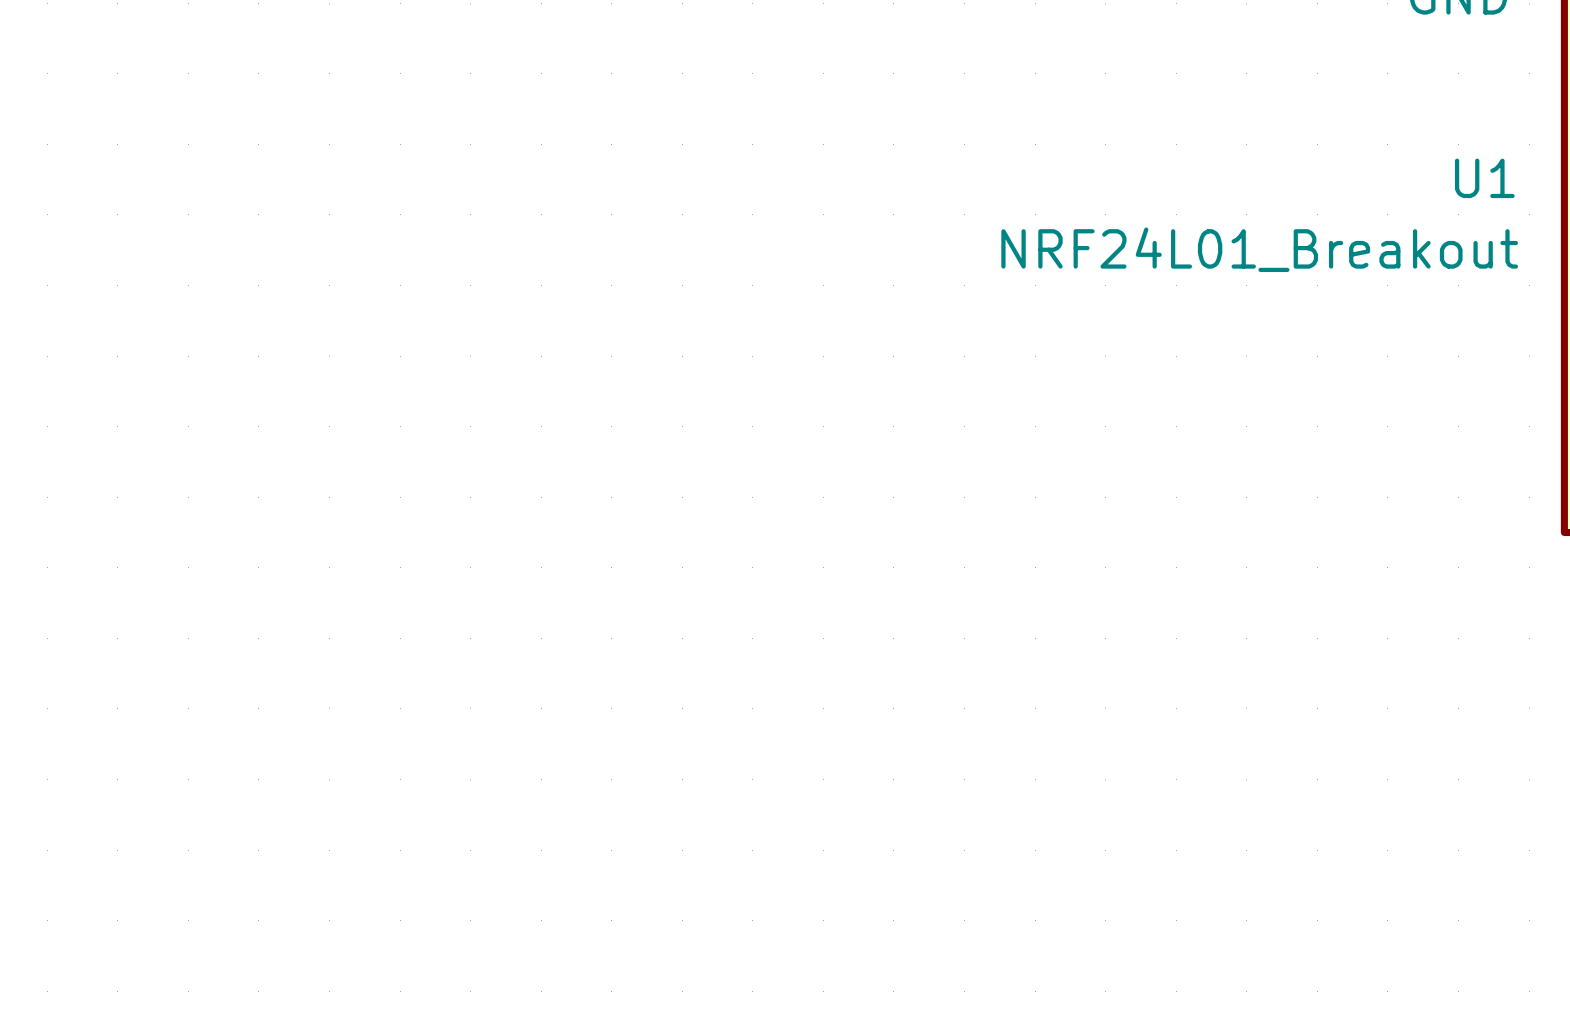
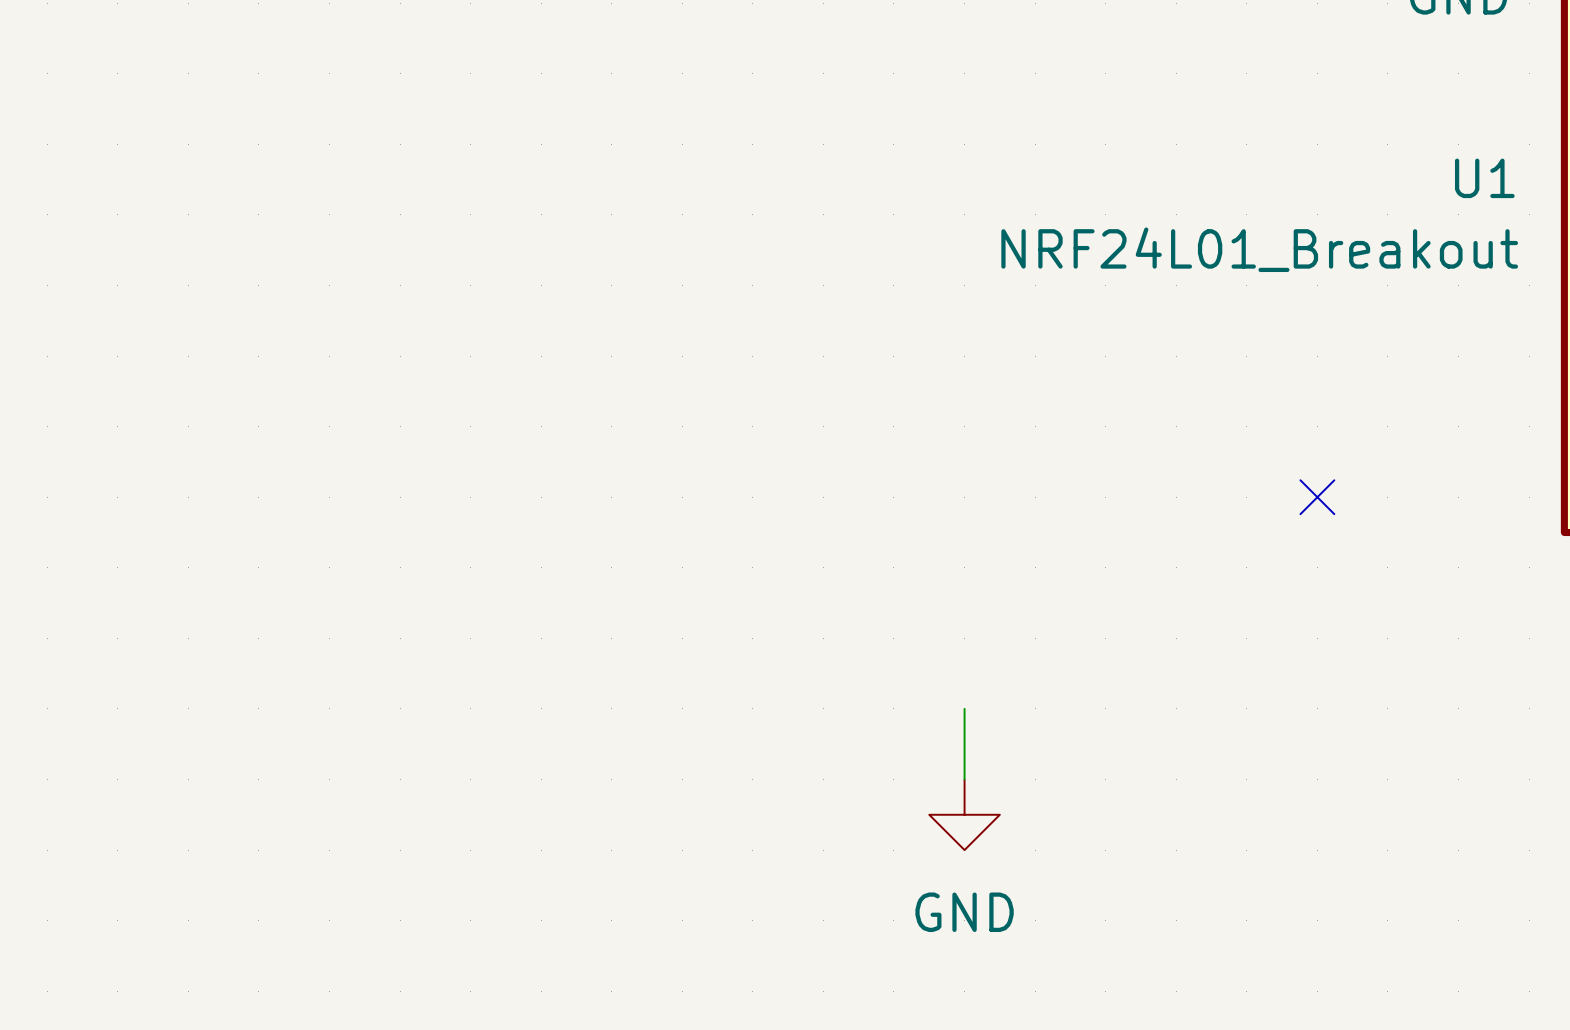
no-connect mark: none -> (1317, 497)
wire: none -> (964, 708) (964, 779)
power symbol: none -> GND (964, 814)

